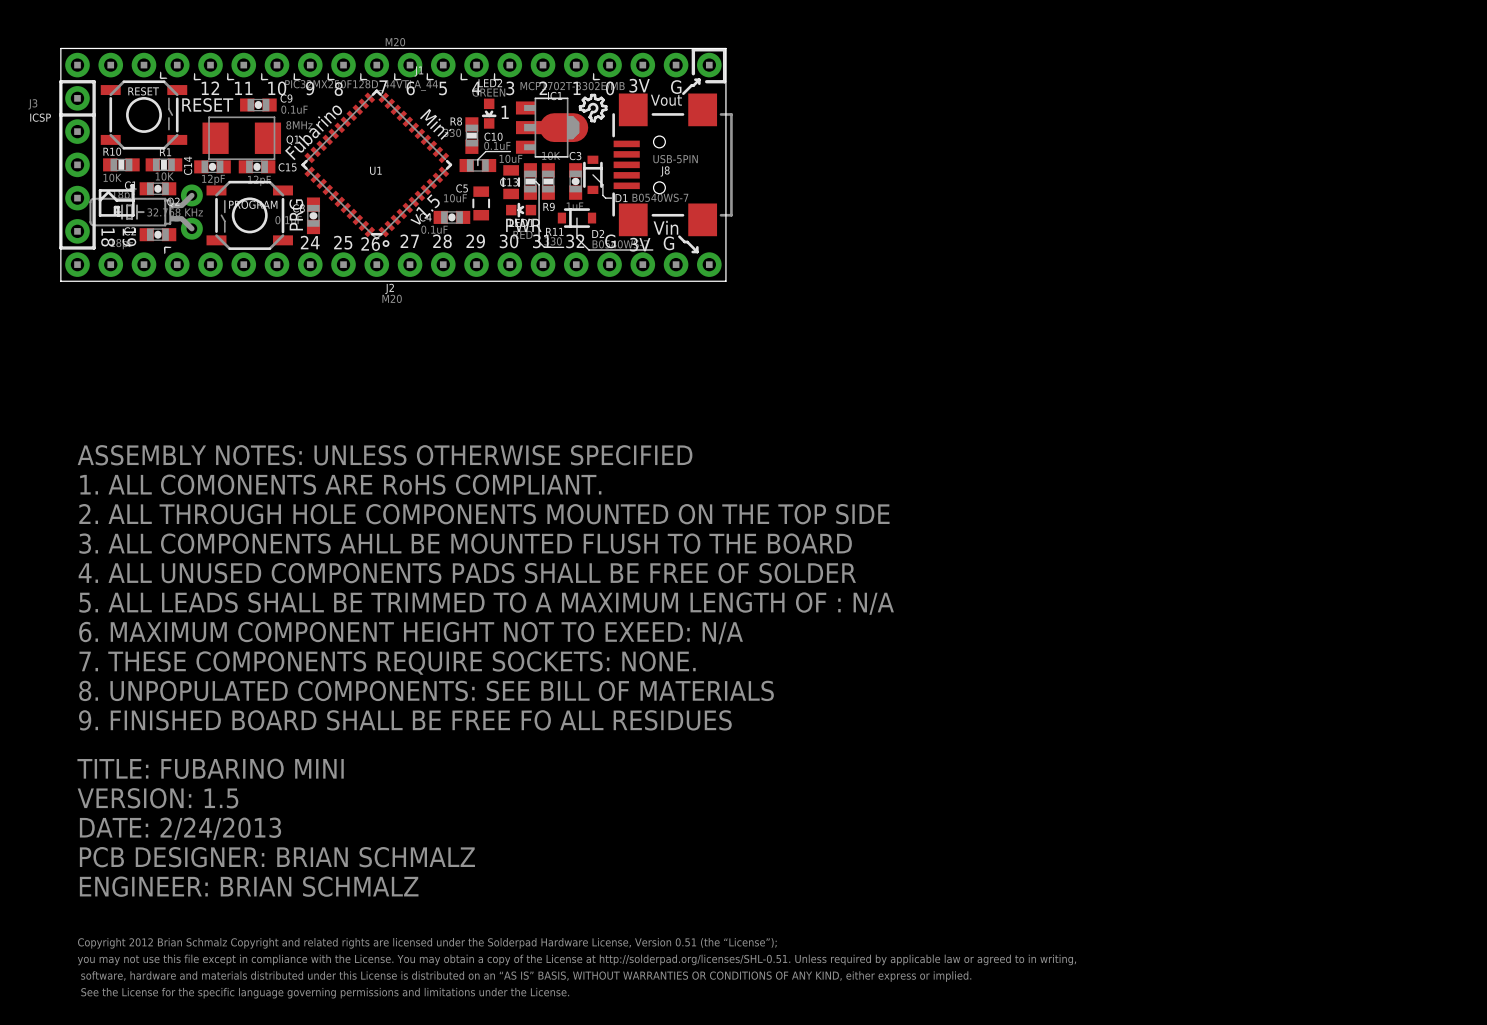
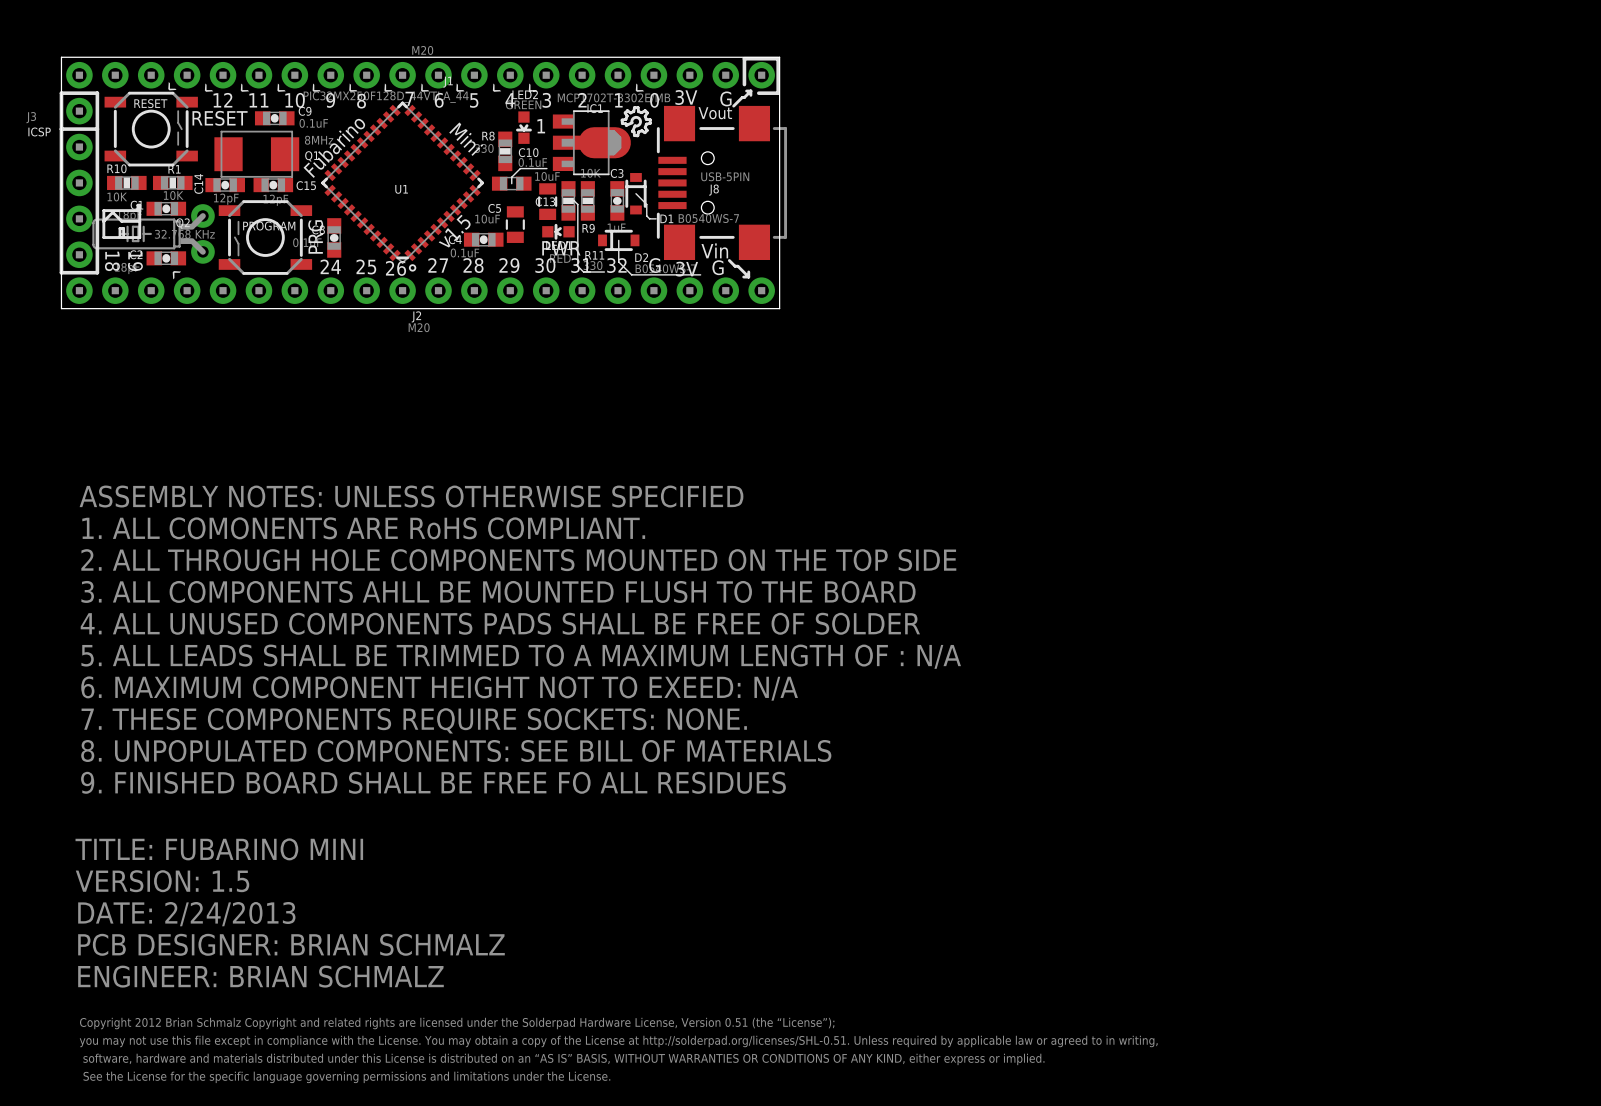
text position: TITLE: FUBARINO MINI (210, 768) -> TITLE: FUBARINO MINI (219, 849)
text position: VERSION: 1.5 (157, 798) -> VERSION: 1.5 (162, 881)
text position: DATE: 2/24/2013 (180, 828) -> DATE: 2/24/2013 (186, 914)
text position: PCB DESIGNER: BRIAN SCHMALZ (277, 857) -> PCB DESIGNER: BRIAN SCHMALZ (291, 944)
text position: ENGINEER: BRIAN SCHMALZ (249, 886) -> ENGINEER: BRIAN SCHMALZ (260, 976)

